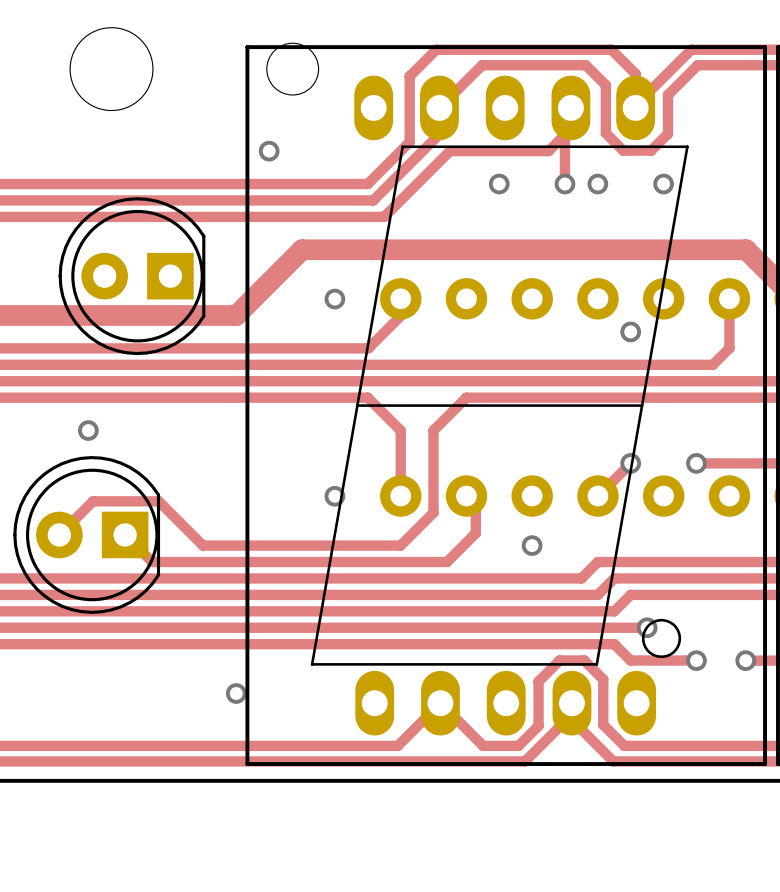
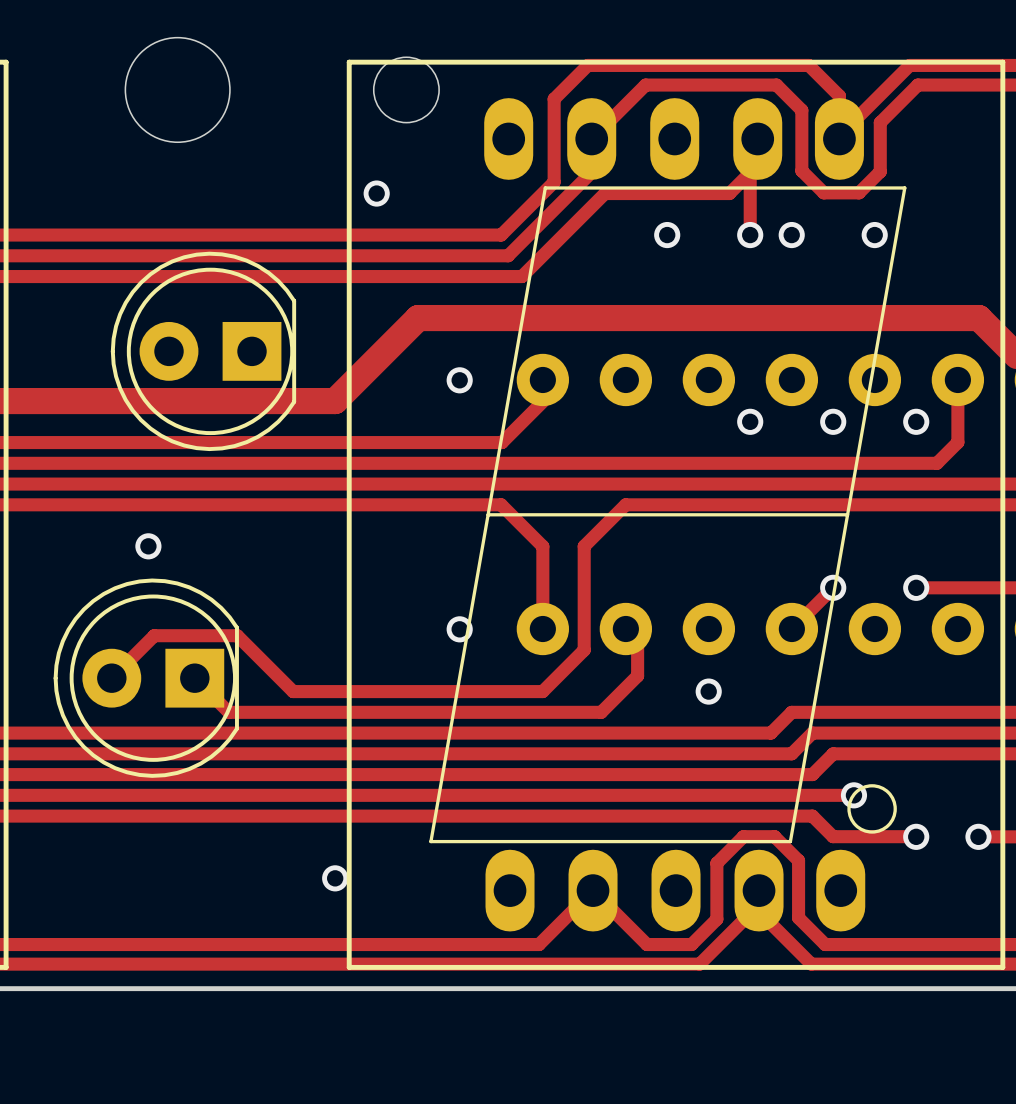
via: none -> (750, 421)
via: none -> (916, 421)

